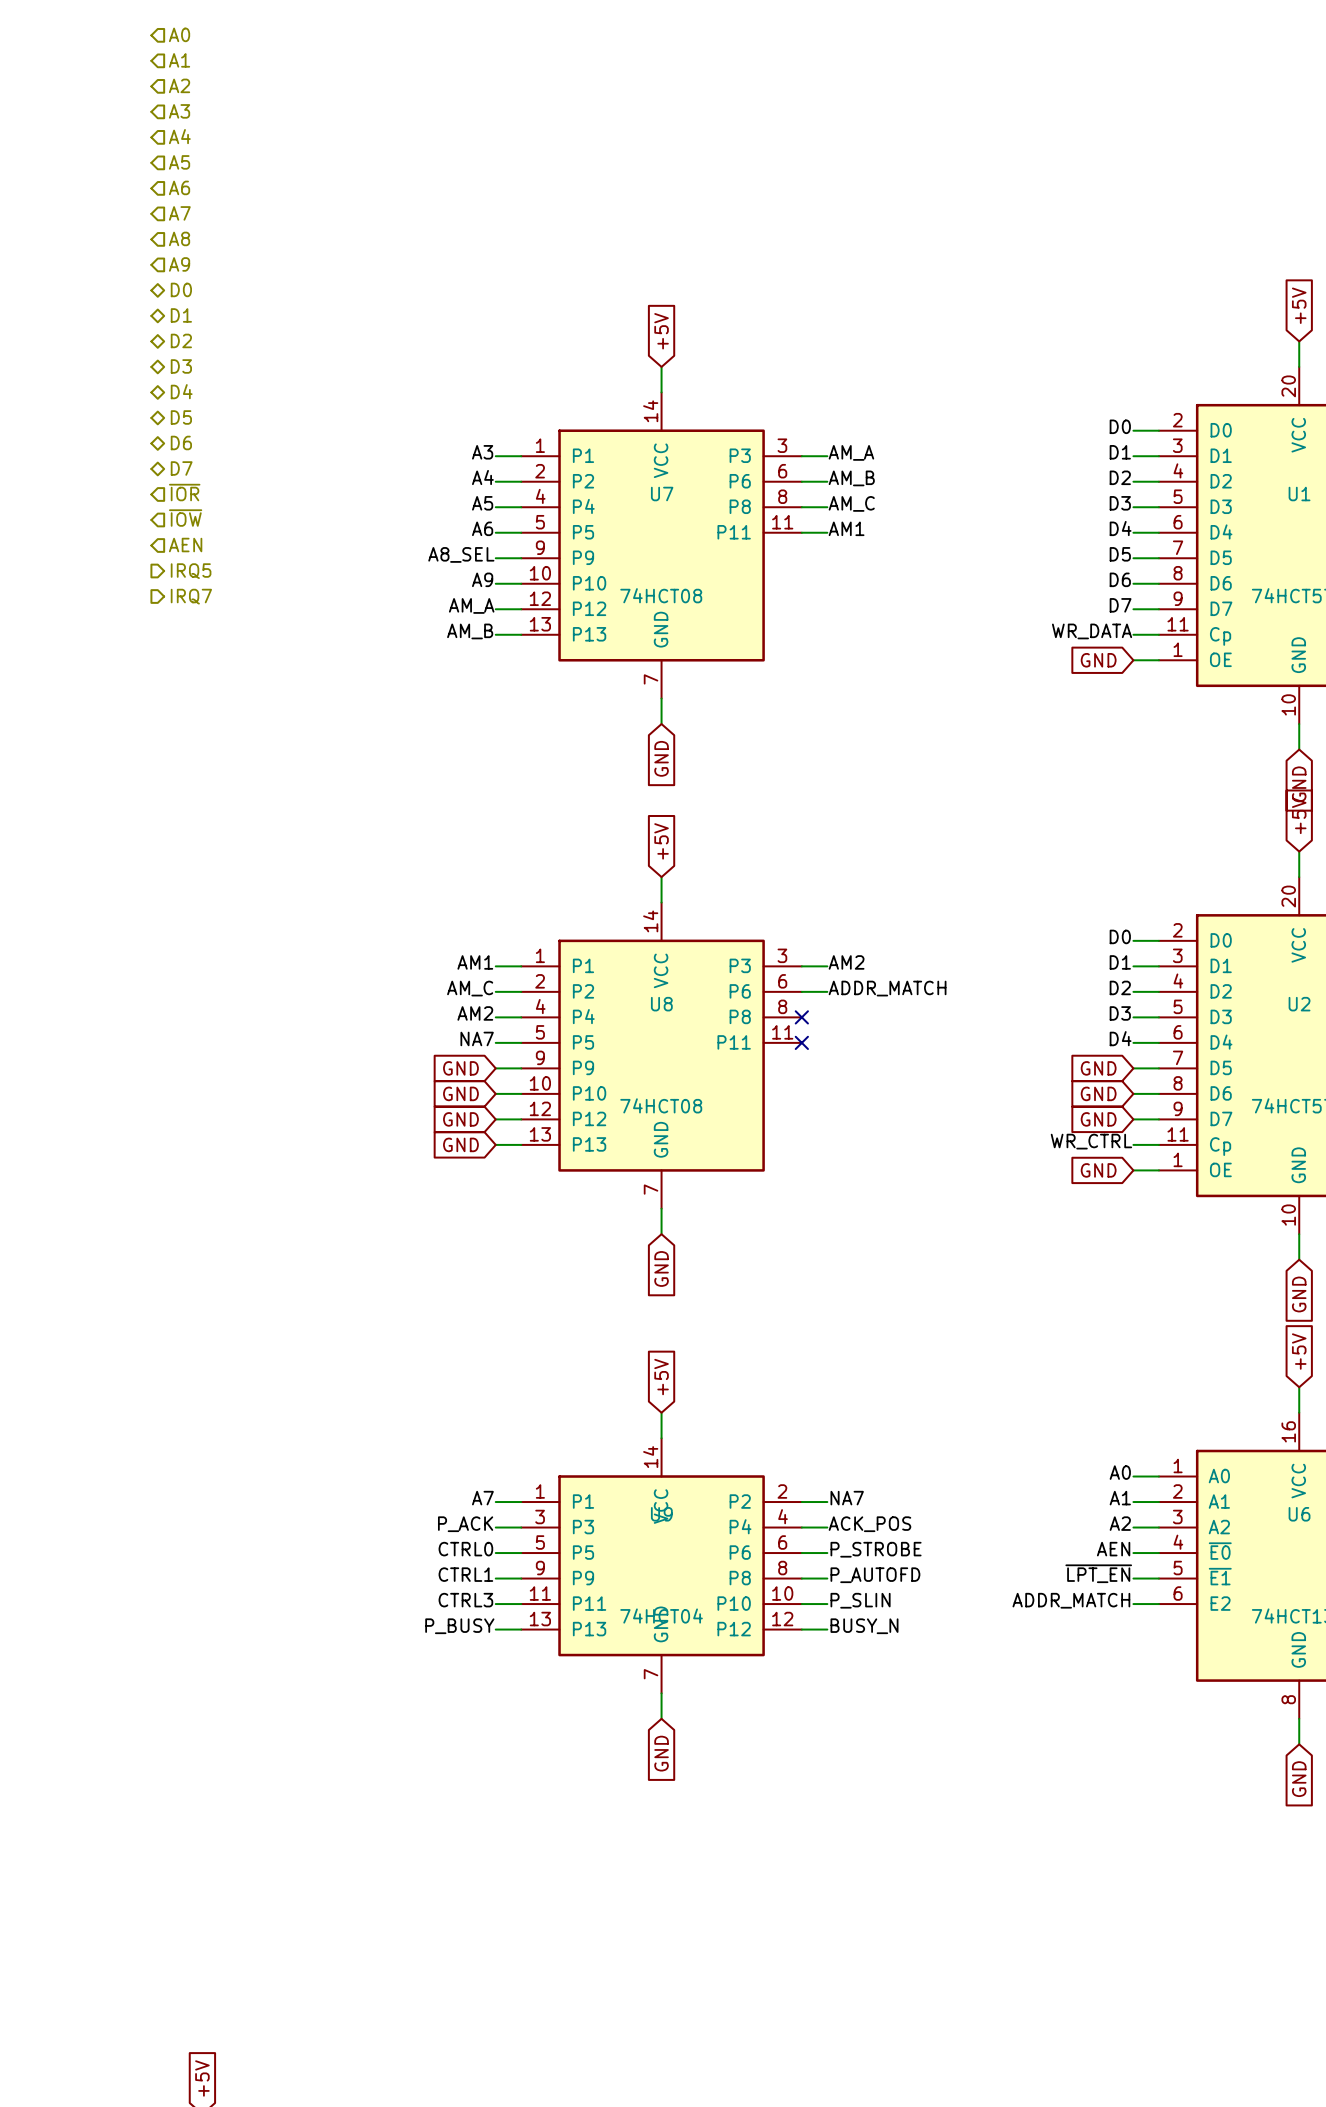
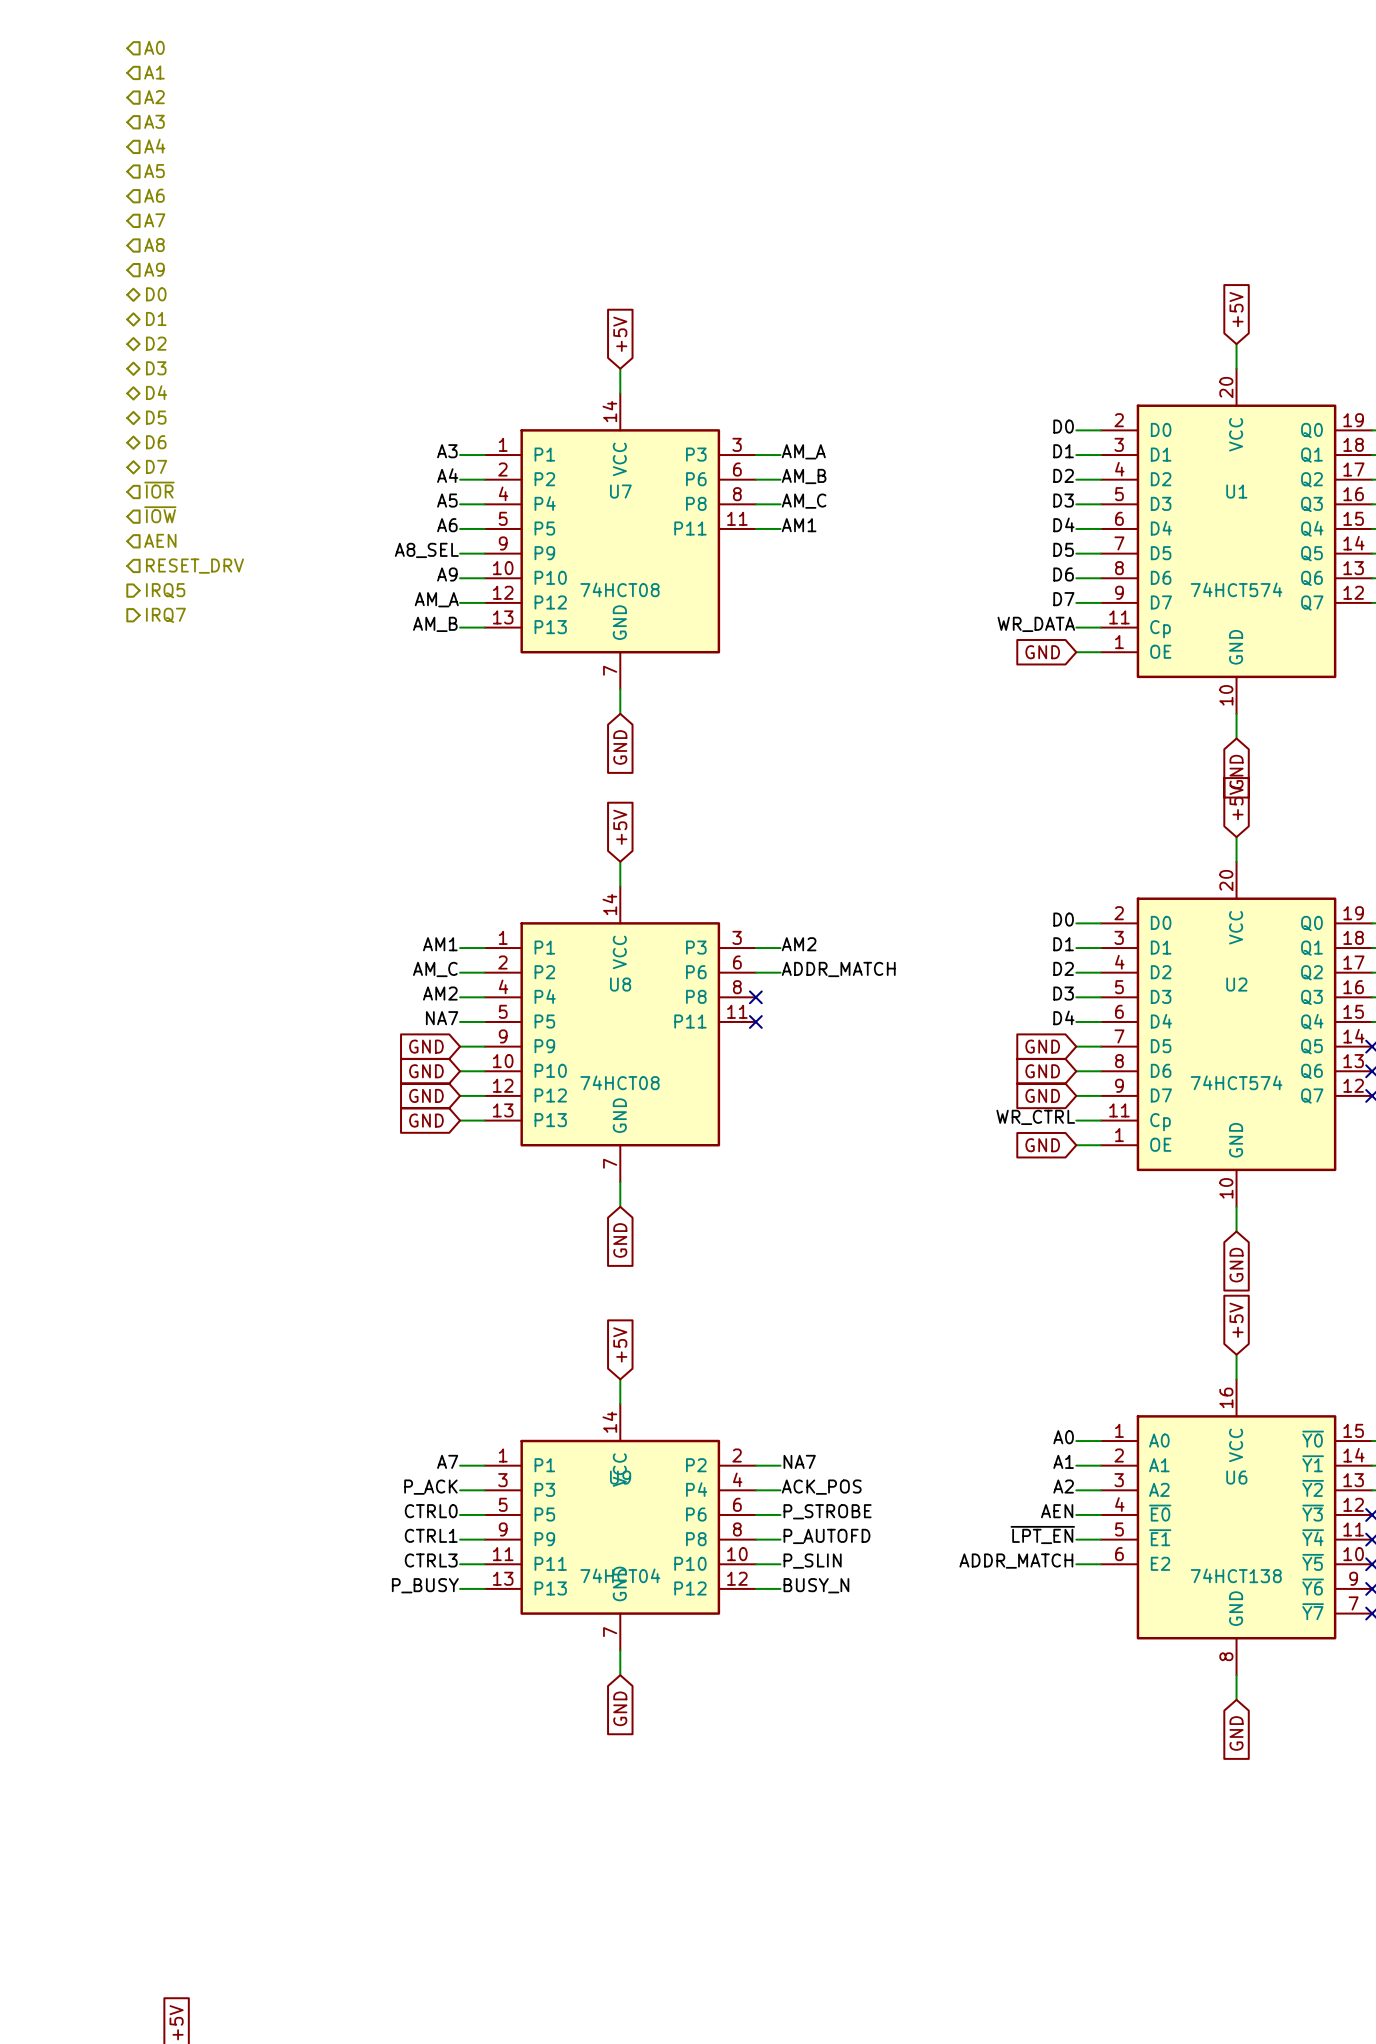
hierarchical label shape: output (191, 571) -> input (194, 566)
hierarchical label: IRQ5 (191, 571) -> RESET_DRV (194, 566)
hierarchical label: IRQ7 (191, 596) -> IRQ5 (165, 590)
hierarchical label: none -> IRQ7 (165, 615)

